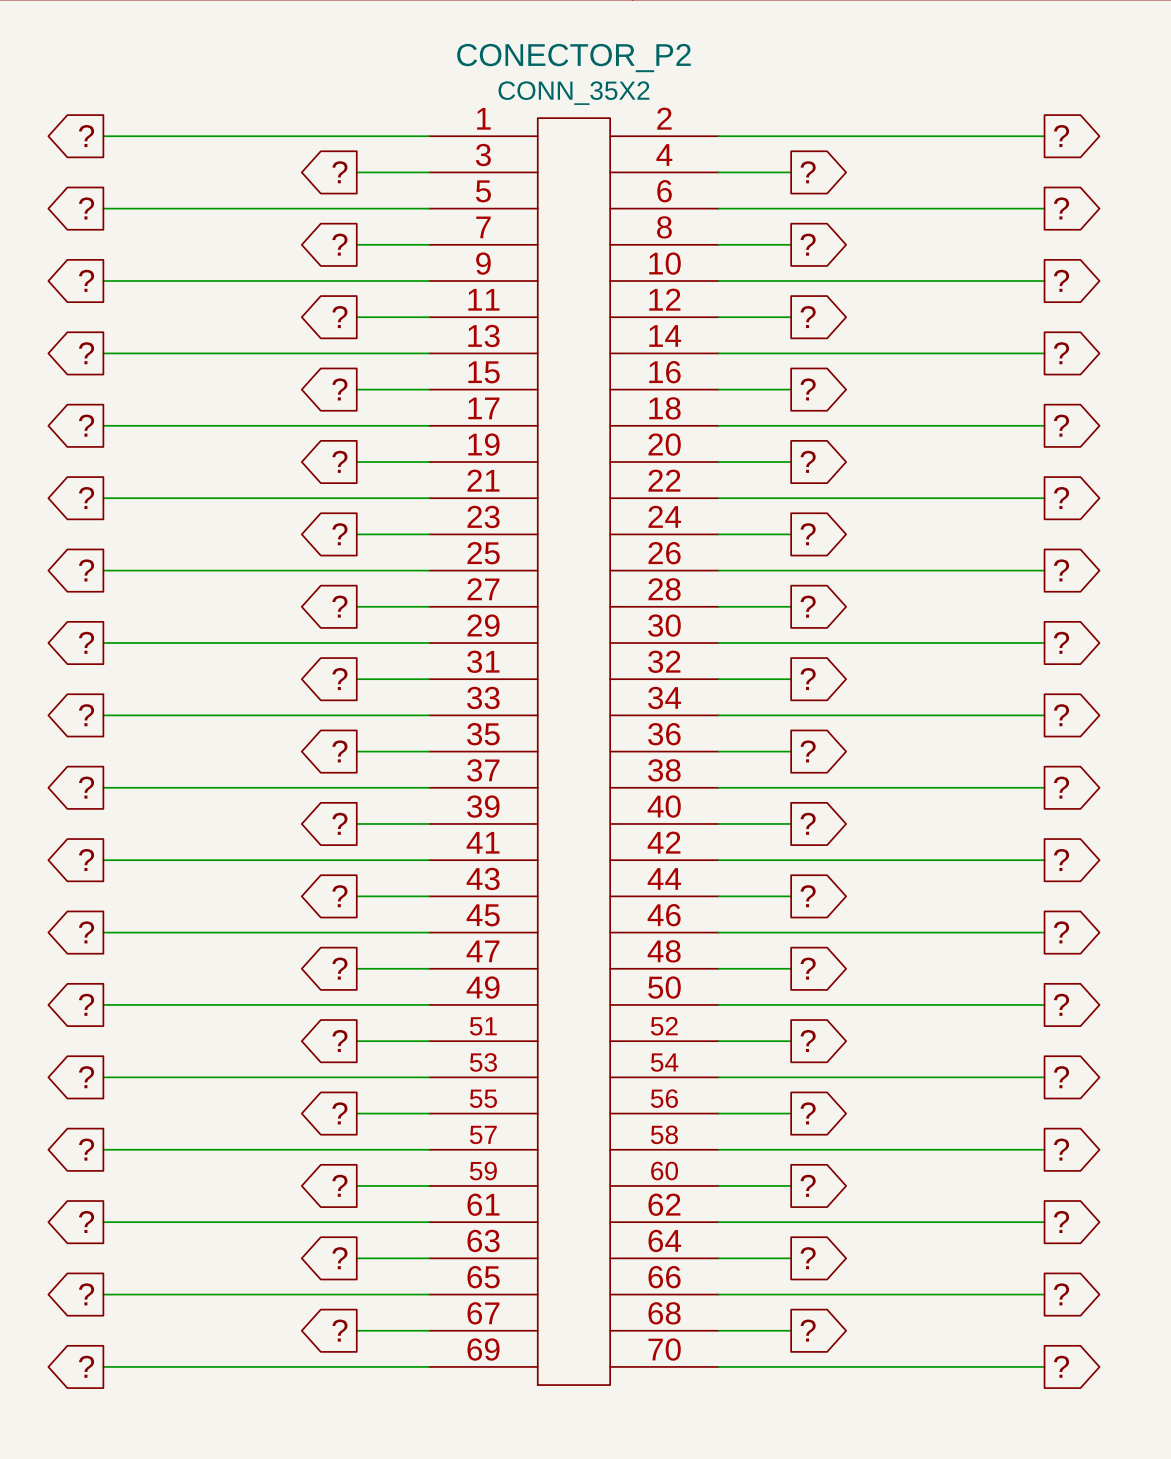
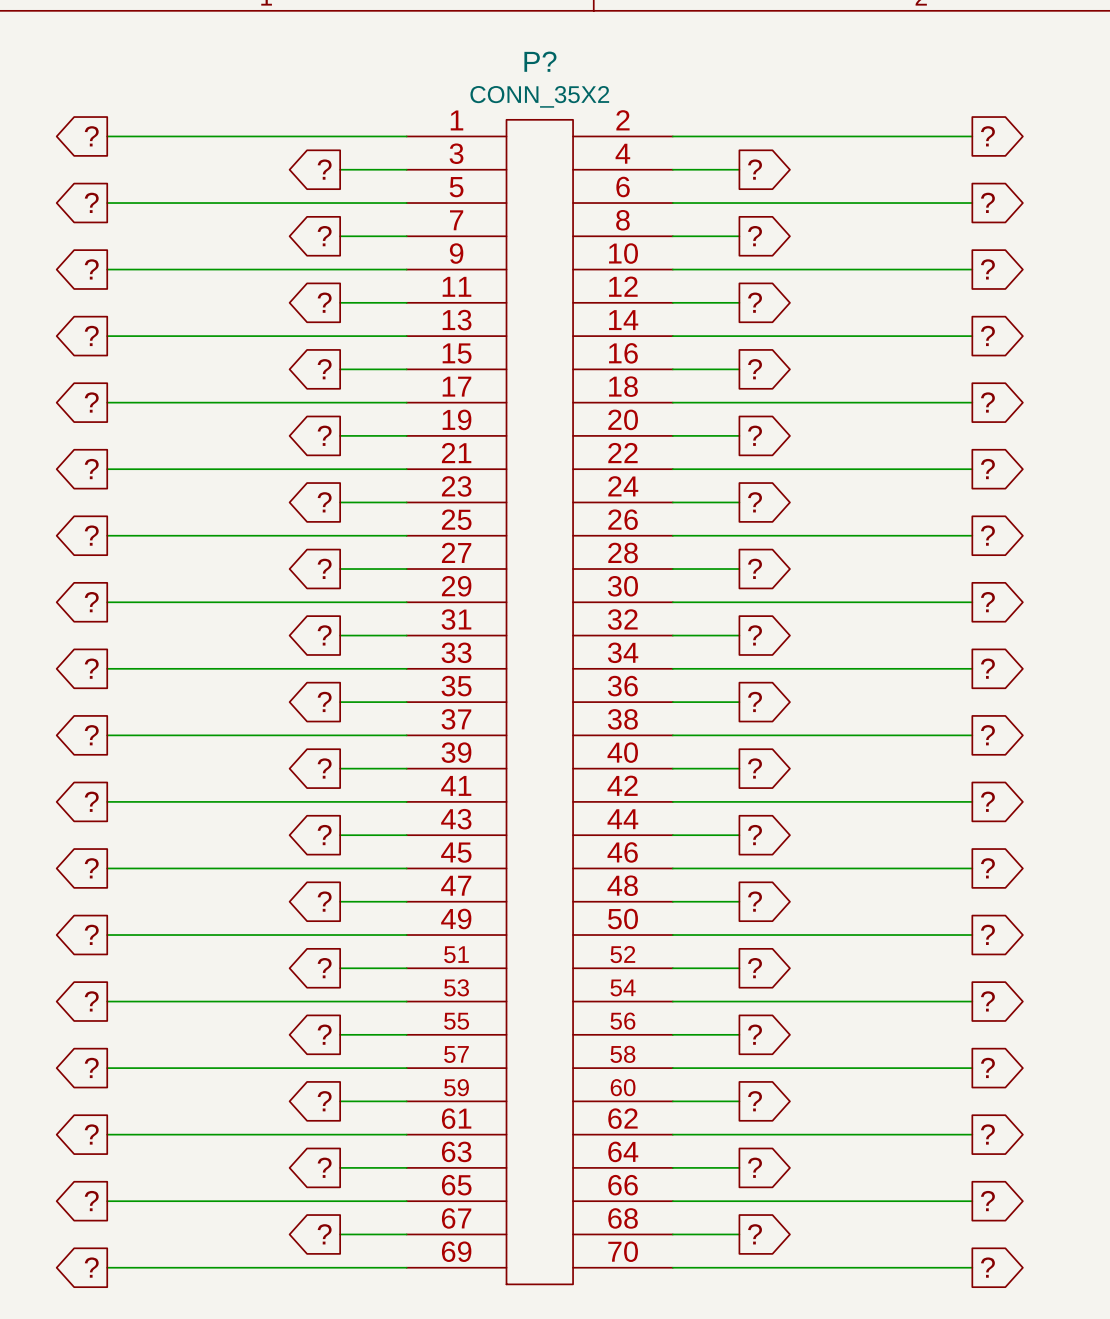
CONECTOR_P2 name: CONECTOR_P2 (573, 58) -> P? (540, 61)

